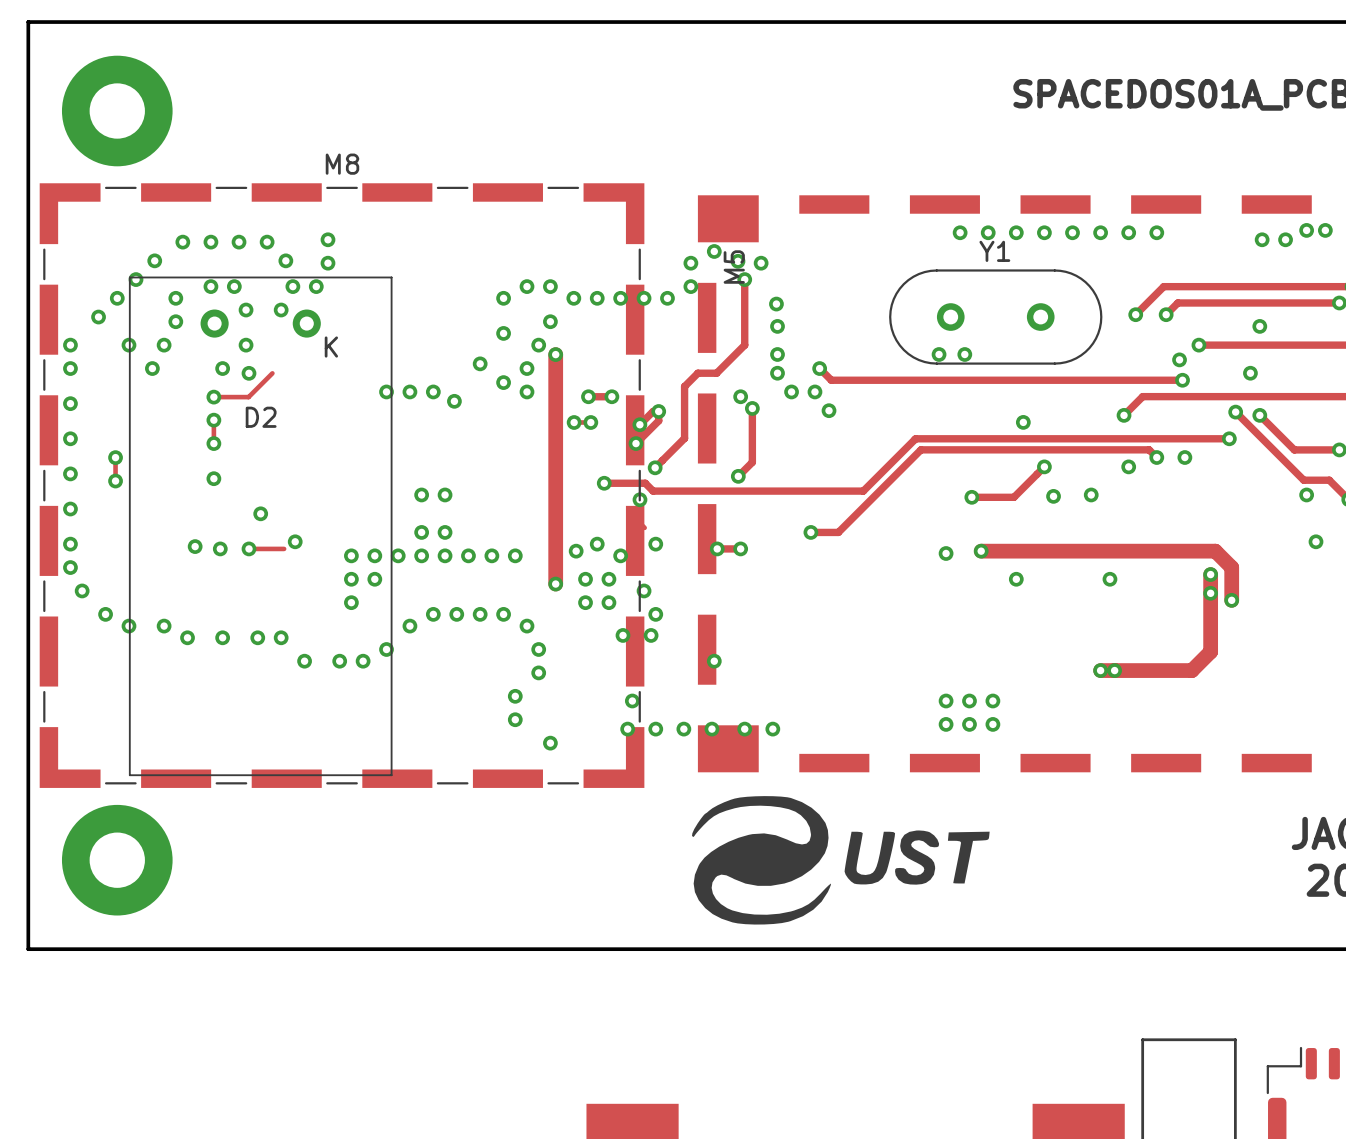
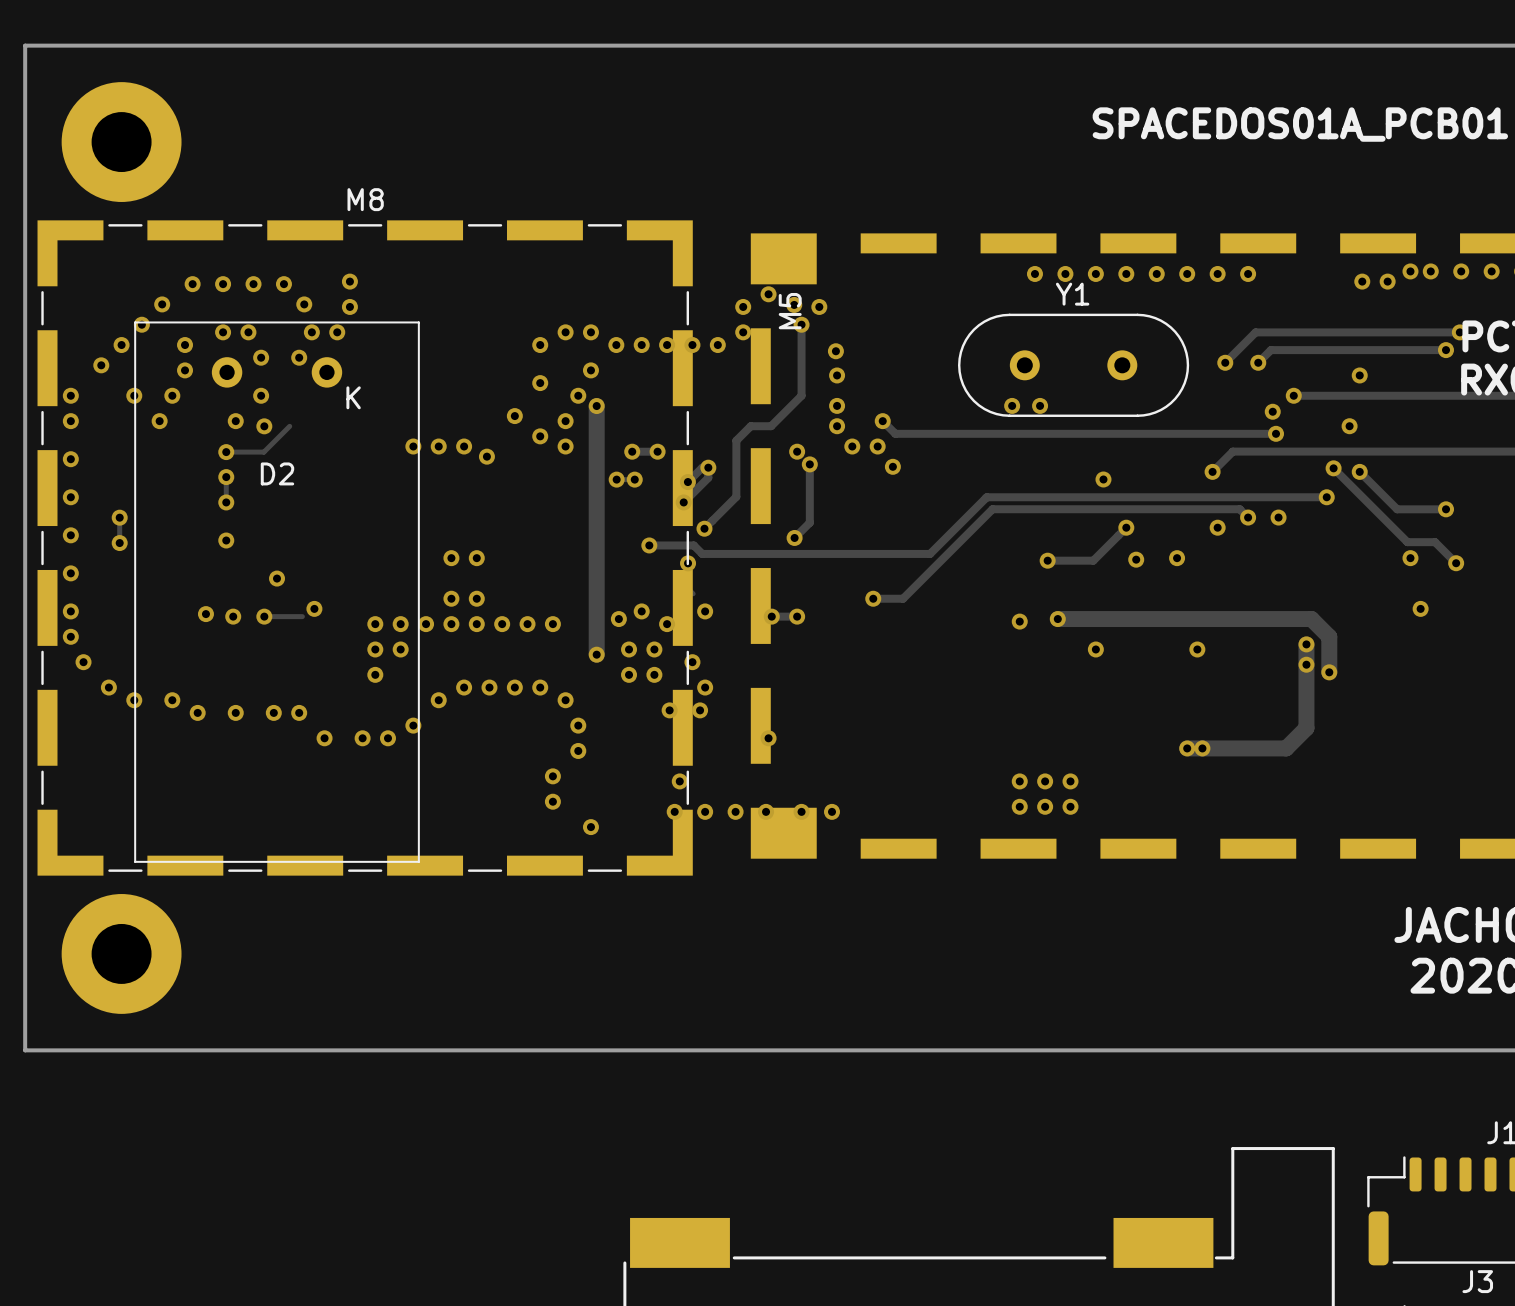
drawing: [692, 796, 990, 925] -> none

